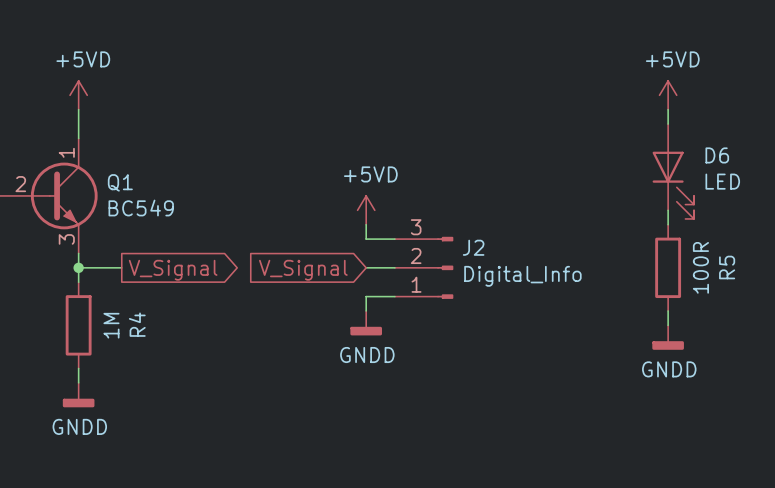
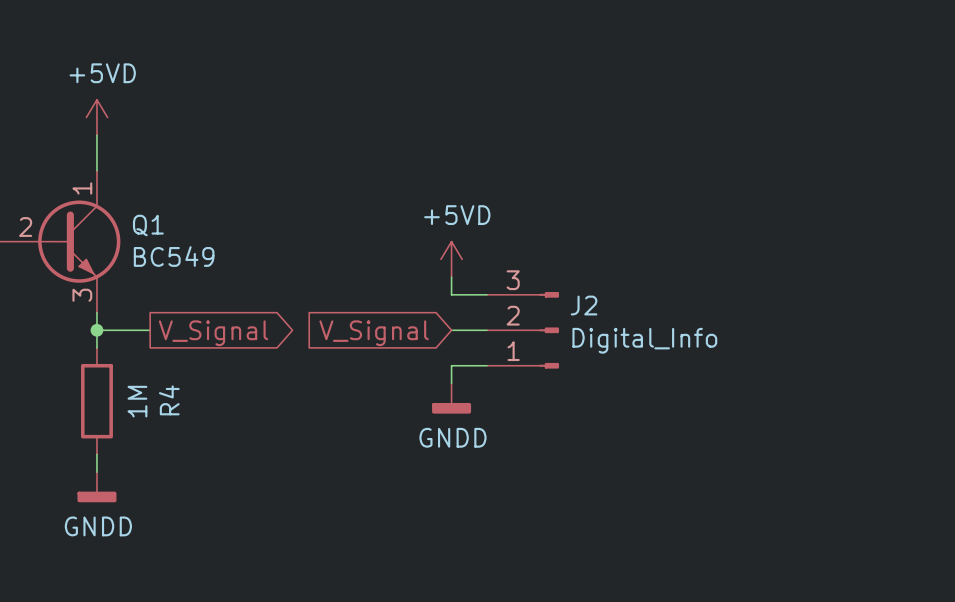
power symbol: +5VD (668, 95) -> none
wire: (668, 109) (668, 124) -> none
D6: LED (673, 171) -> none
wire: (668, 210) (668, 224) -> none
R5: 100R (668, 267) -> none
wire: (668, 310) (668, 325) -> none
power symbol: GNDD (668, 337) -> none

